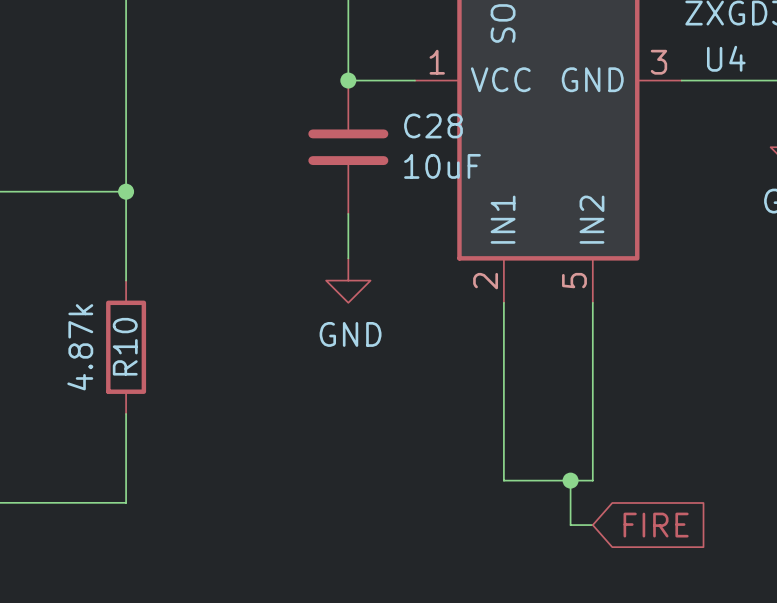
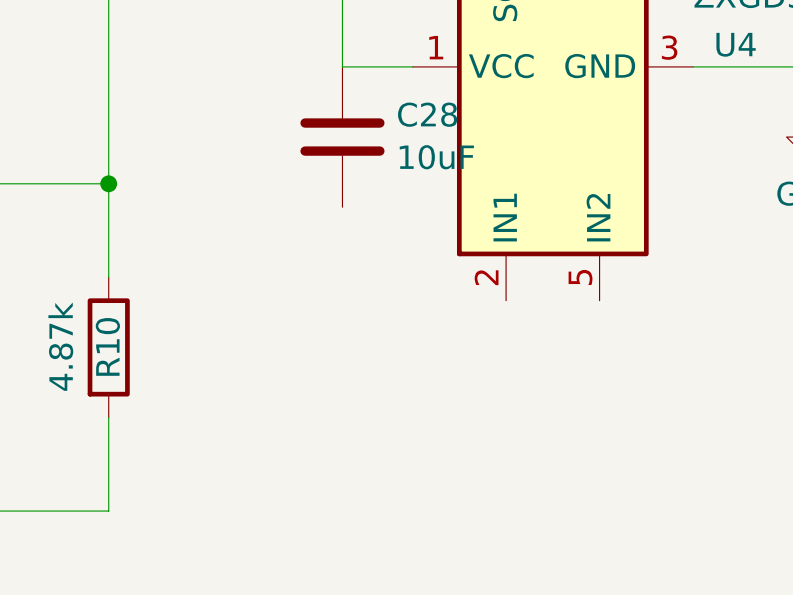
junction: (348, 80) -> none
wire: (348, 213) (348, 258) -> none
power symbol: GND (348, 280) -> none
wire: (503, 302) (503, 480) (592, 480) (592, 302) -> none
wire: (570, 480) (570, 525) (592, 525) -> none
junction: (570, 480) -> none
global label: FIRE (656, 525) -> none

